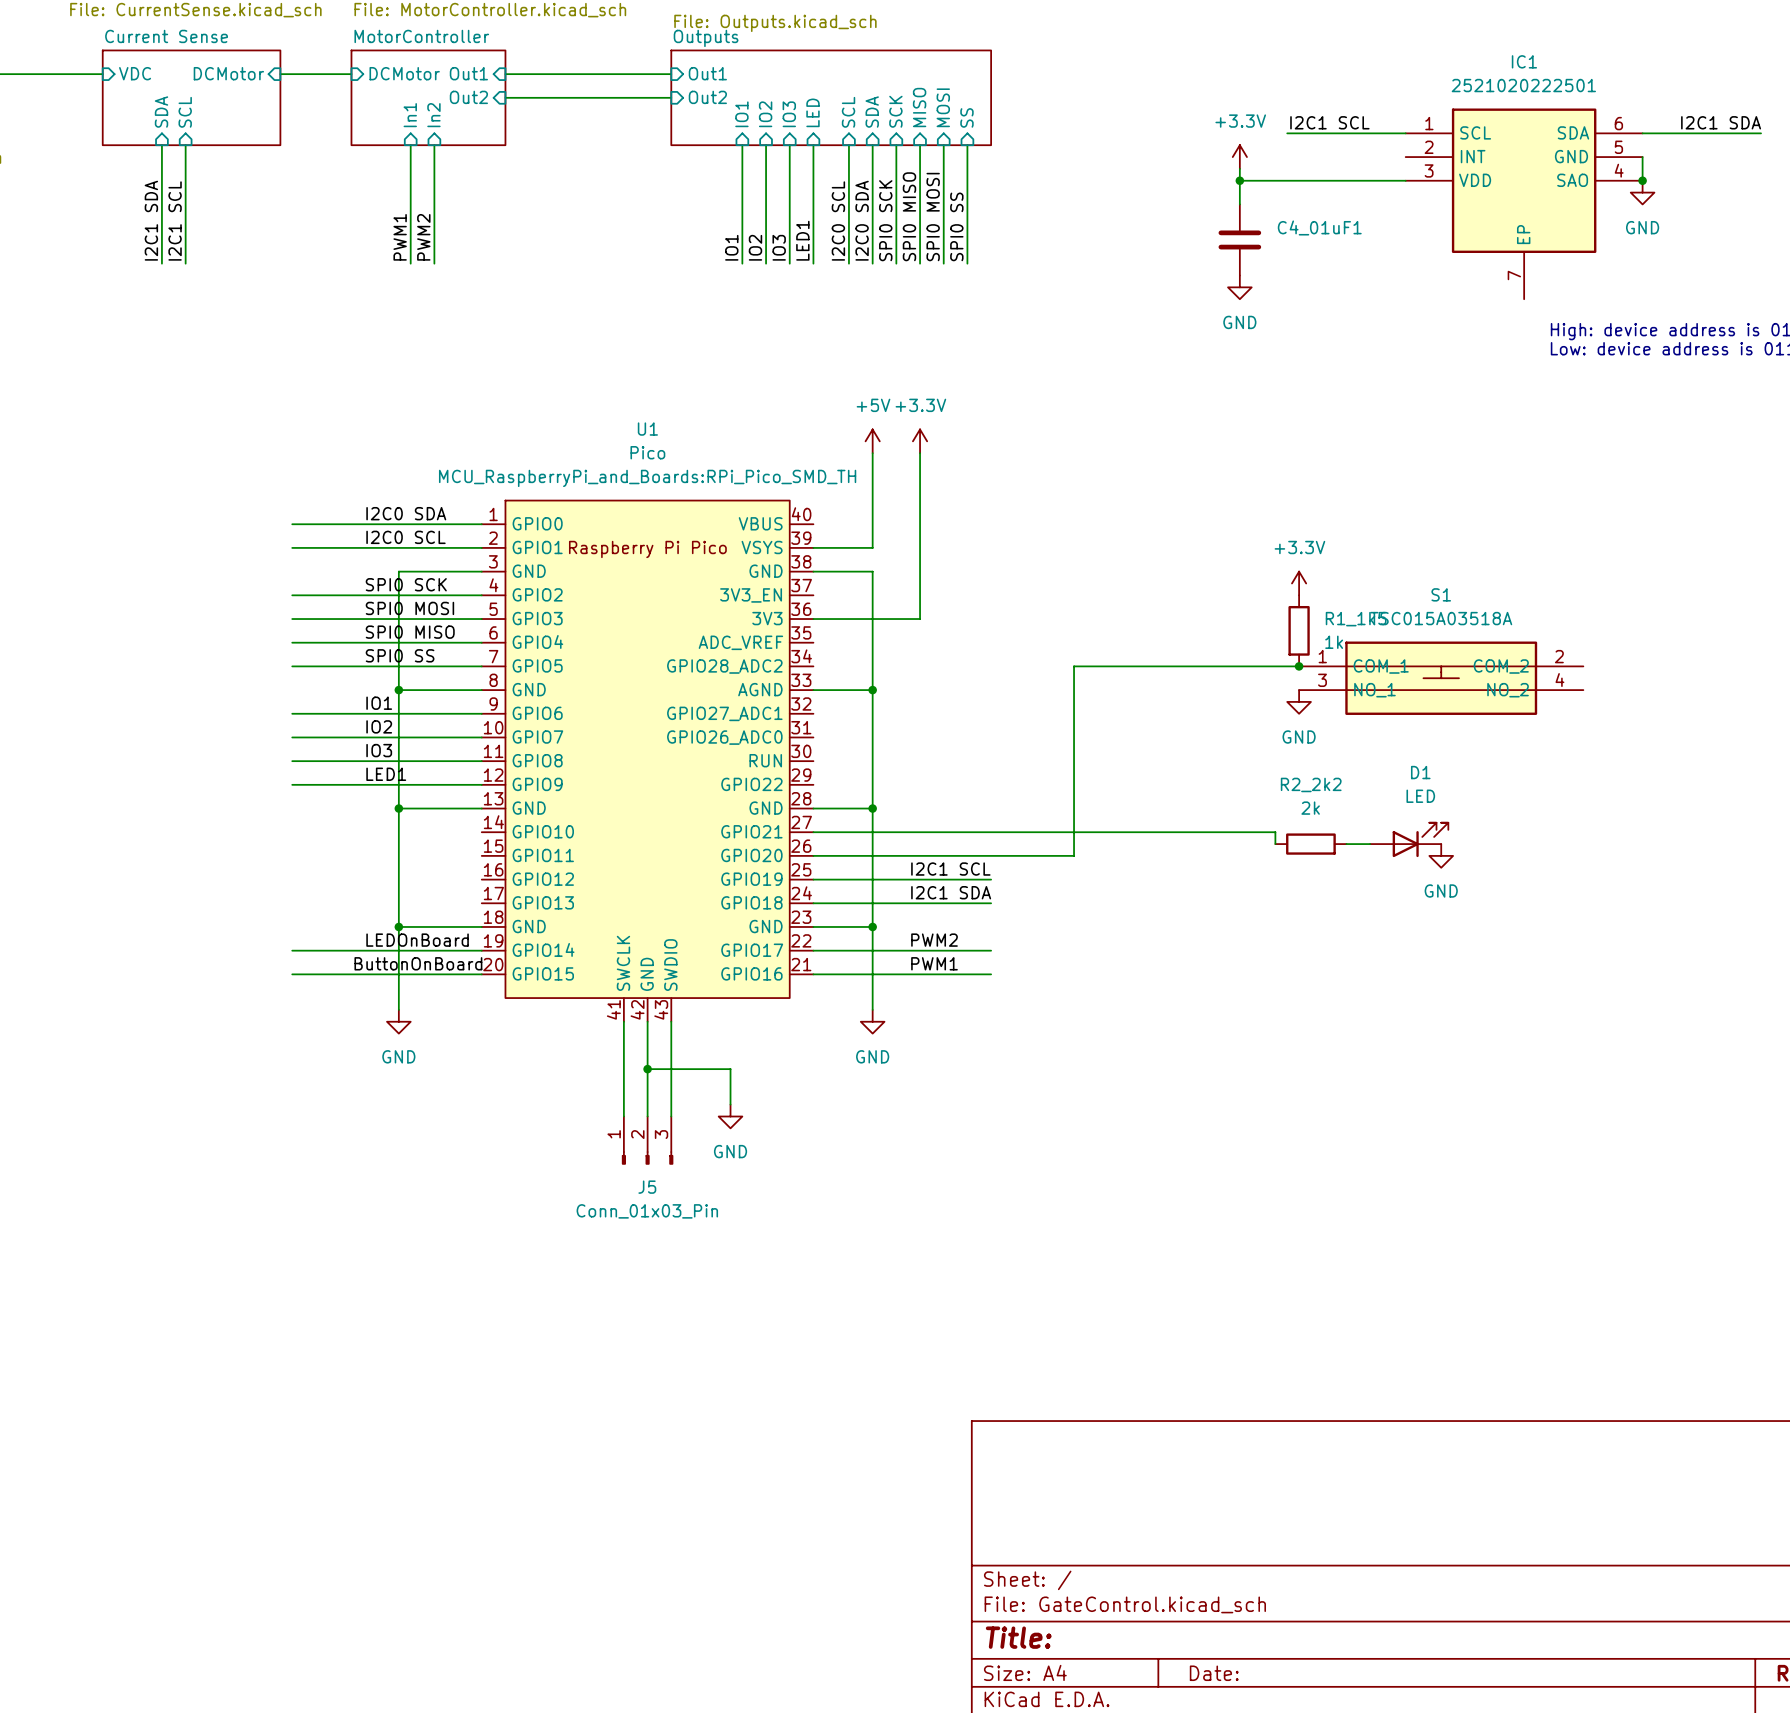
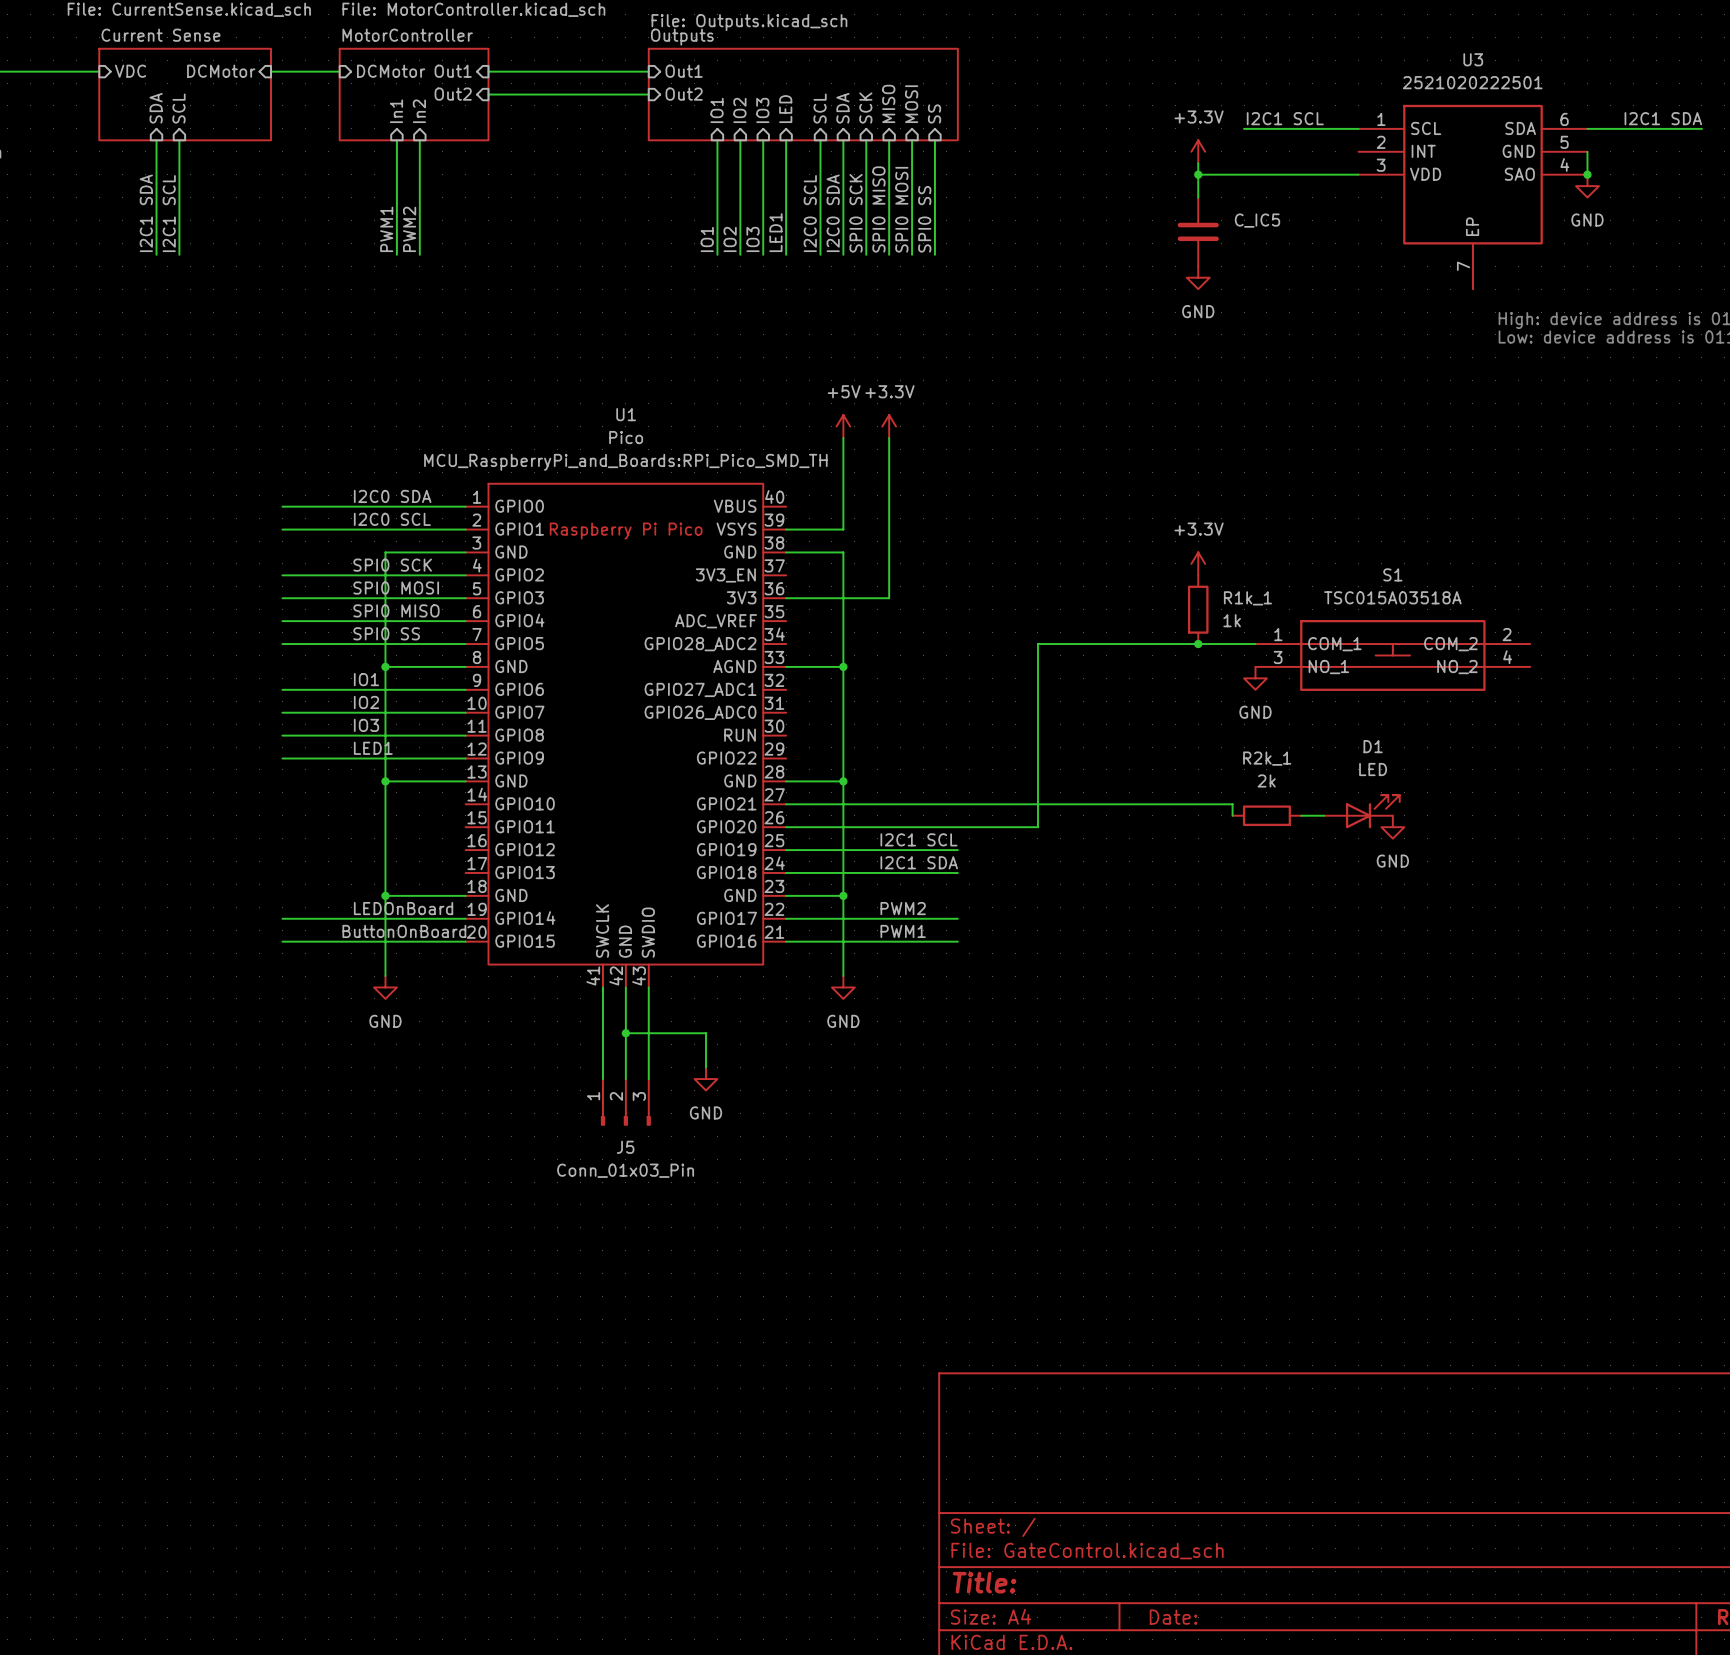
IC1 name: IC1 (1524, 61) -> U3 (1473, 59)
C4_01uF1 name: C4_01uF1 (1319, 227) -> C_IC5 (1257, 220)
power symbol position: +3.3V (1299, 583) -> +3.3V (1198, 563)
R1k_1: none -> 1k (1198, 609)
R1_1k5: 1k (1299, 630) -> none
junction: none -> (1198, 644)
junction: (1299, 666) -> none
R2_2k2 name: R2_2k2 (1311, 784) -> R2k_1 (1267, 758)

